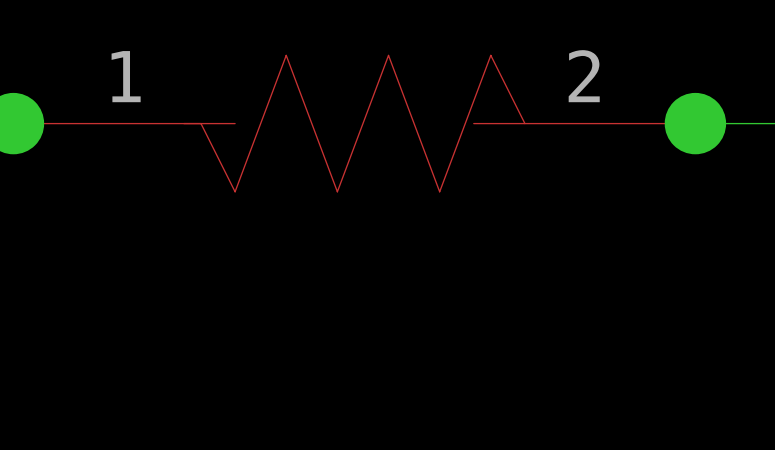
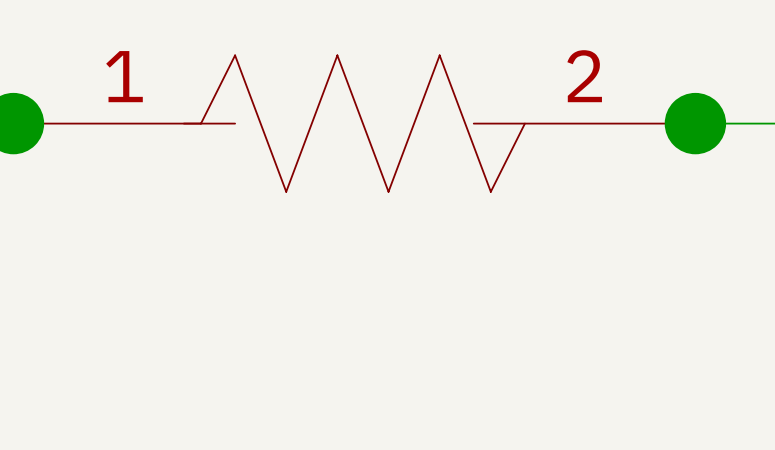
part flip: as is (354, 123) -> up-down (354, 123)

